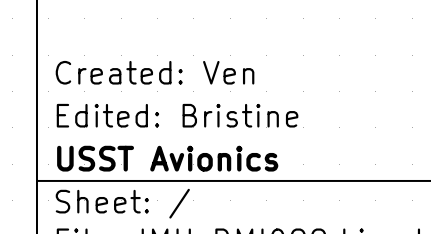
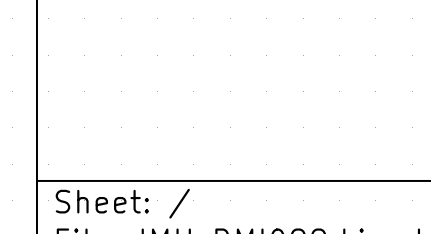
title block: Created: Ven (155, 72) -> none
title block: Edited: Bristine (177, 115) -> none
title block: USST Avionics (167, 158) -> none

